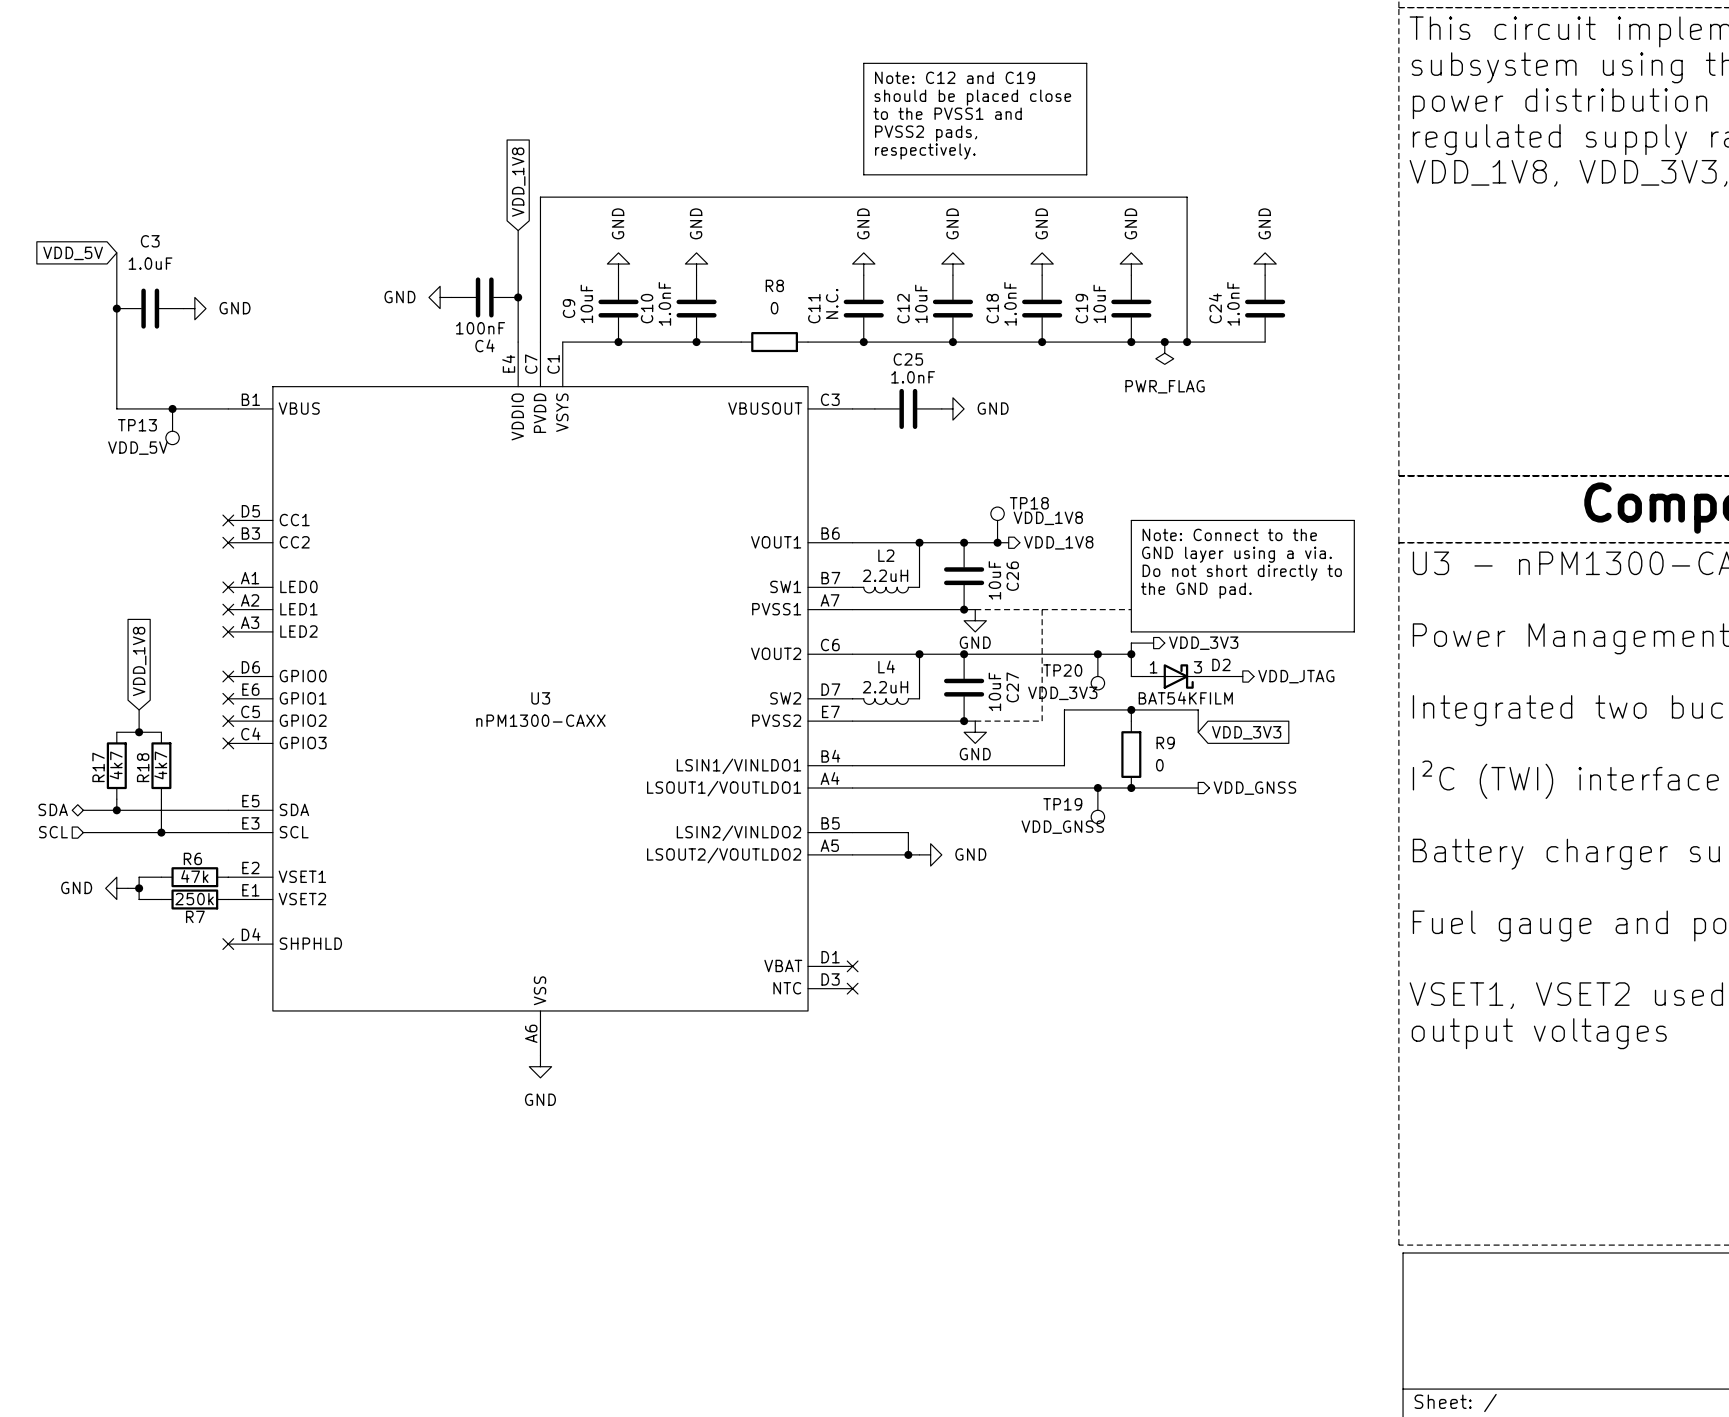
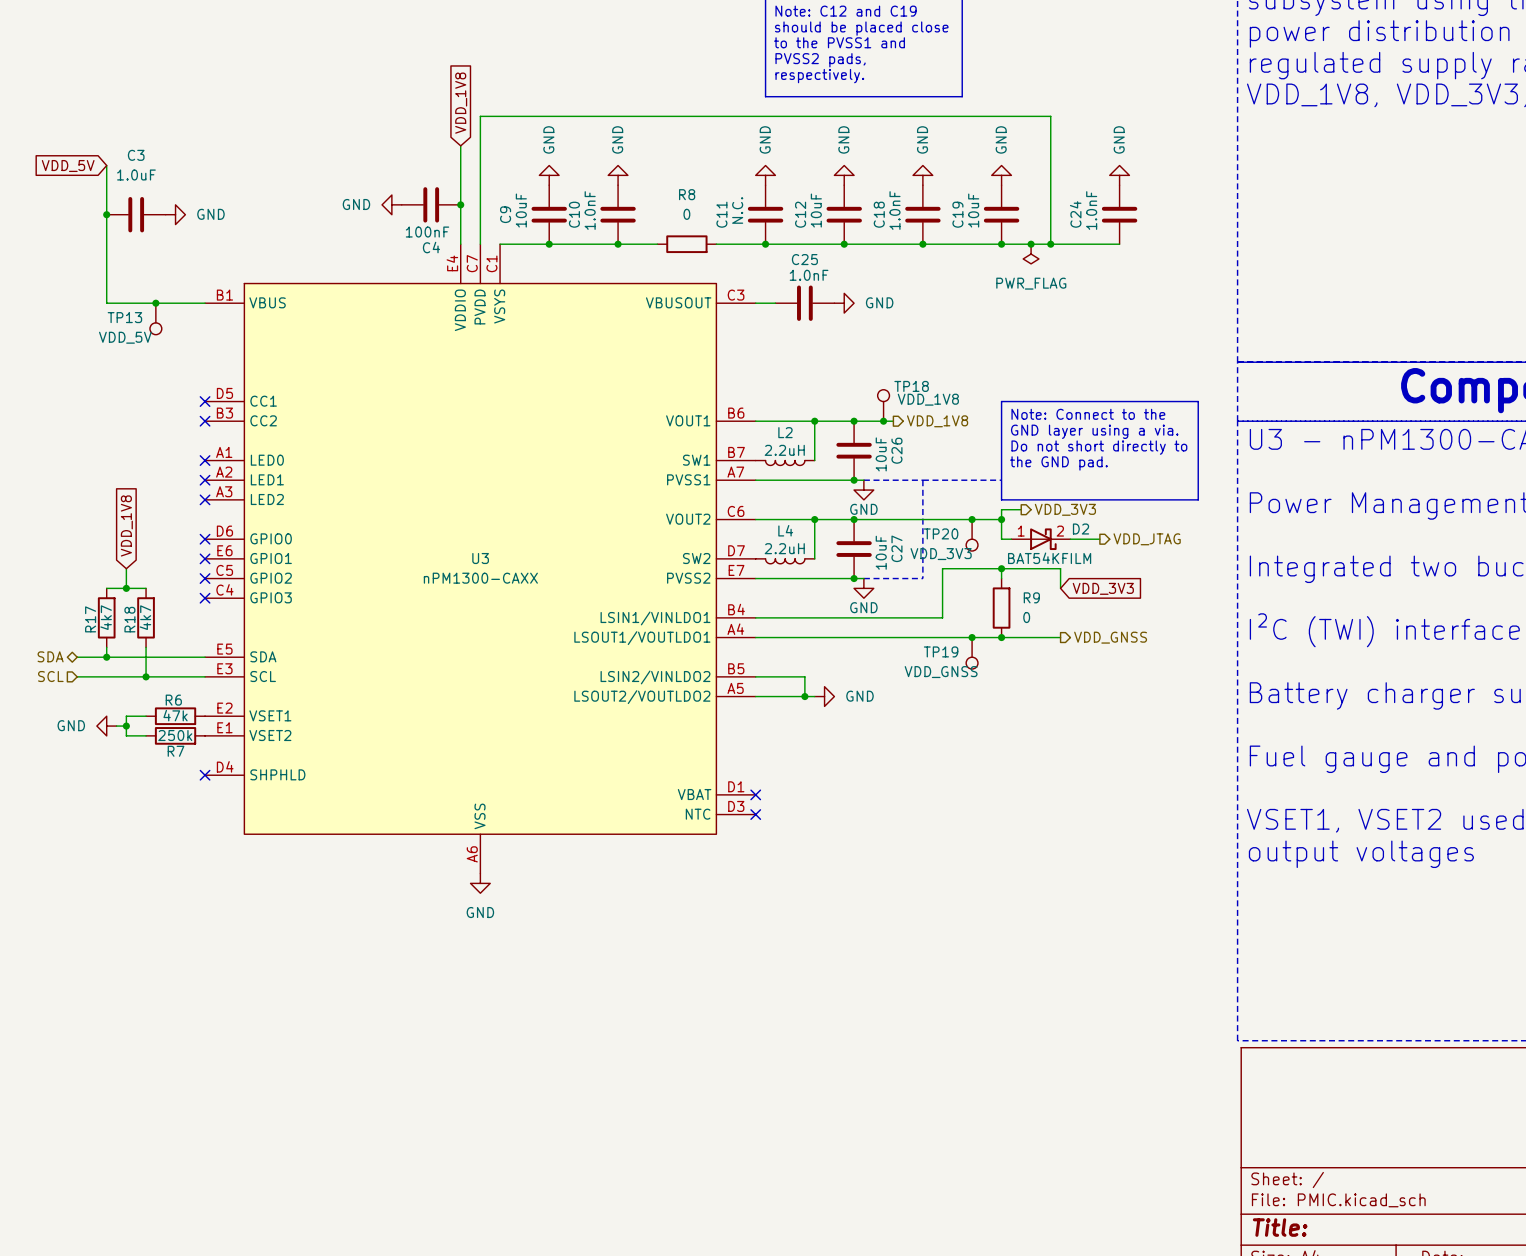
D2 pin number: 3 (1197, 667) -> 2 (1060, 531)

